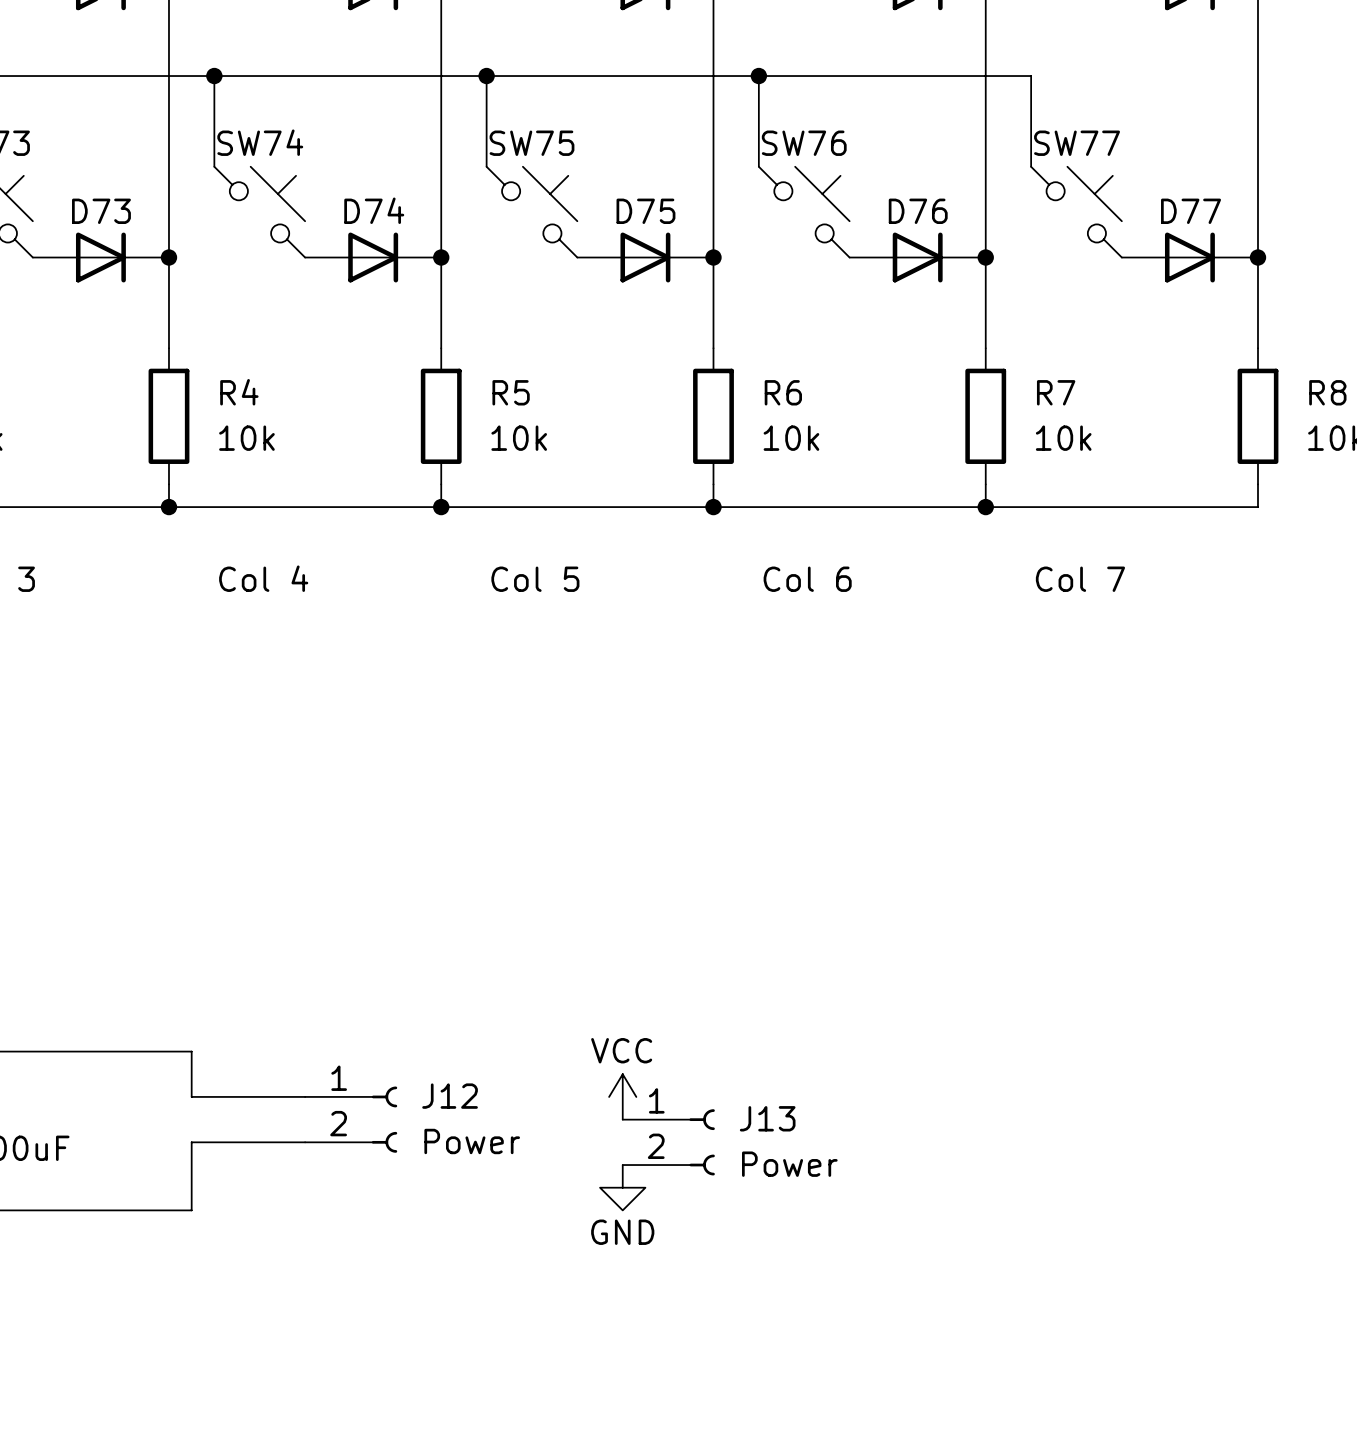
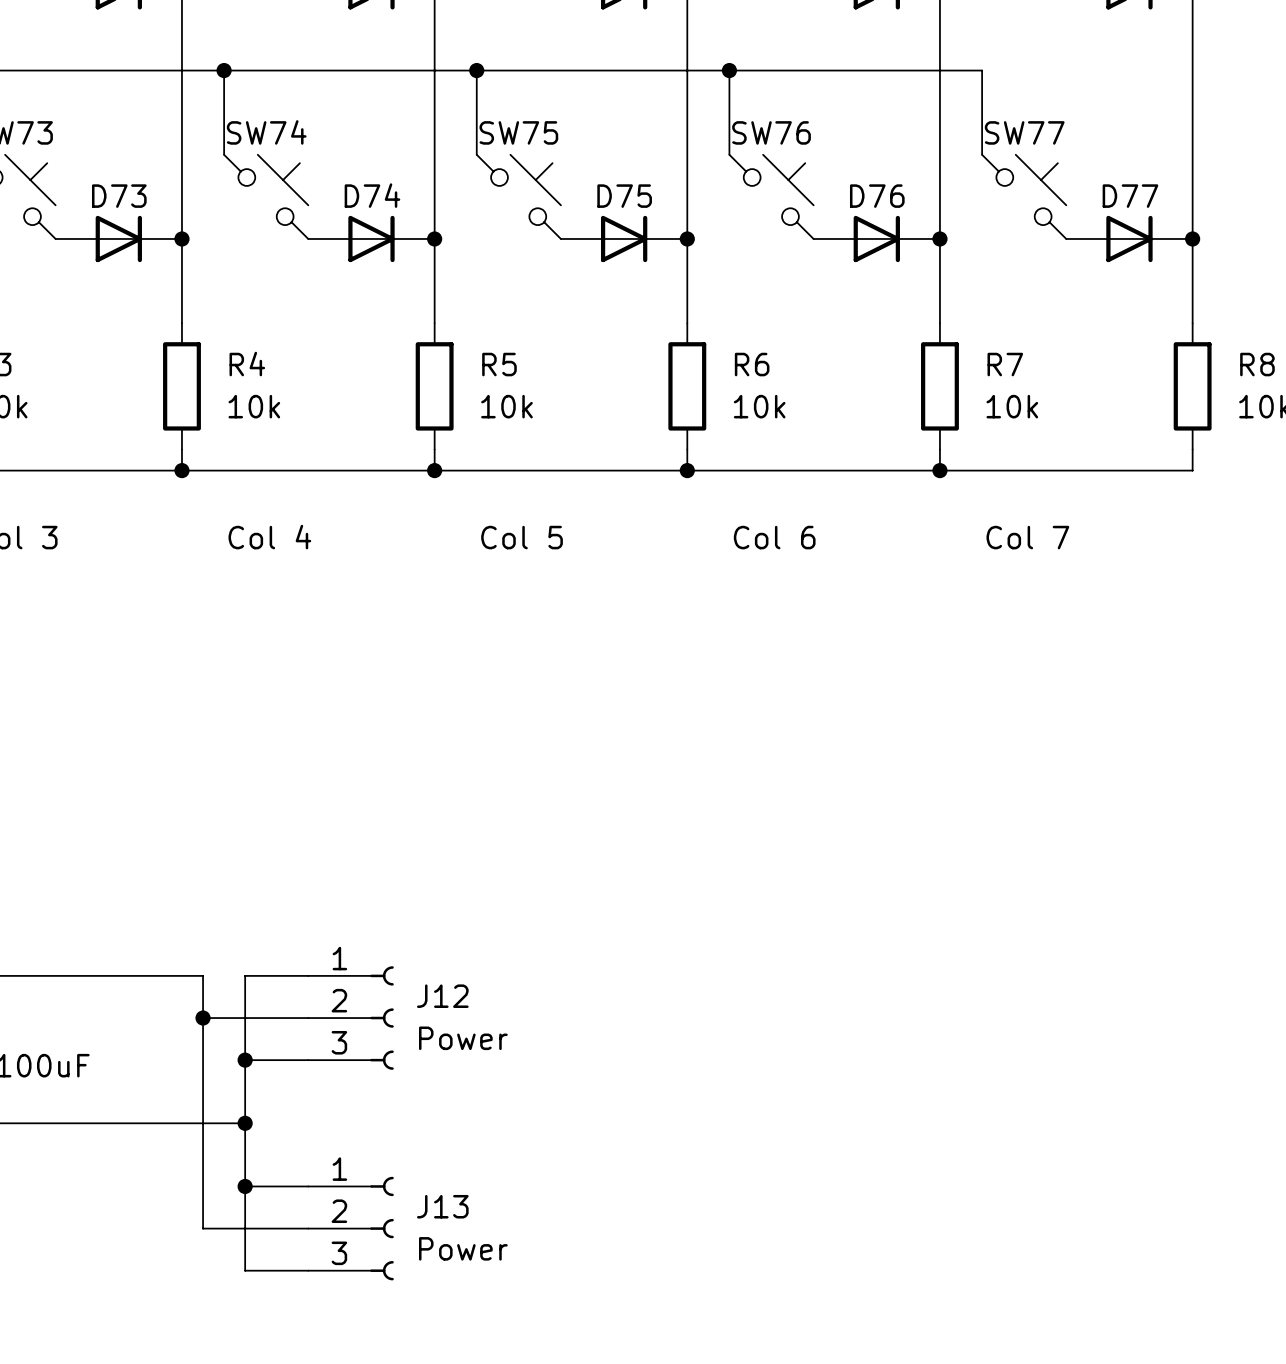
wire: none -> (308, 975) (245, 975) (245, 1270) (308, 1270)
J12 symbol: [305, 1086, 398, 1153] -> [308, 966, 394, 1070]
junction: none -> (203, 1018)
power symbol: VCC (622, 1096) -> none
J13 symbol: [622, 1109, 715, 1176] -> [308, 1176, 394, 1281]
wire: (191, 1142) (237, 1142) -> (203, 1060) (203, 1018)
junction: none -> (245, 1060)
power symbol: GND (622, 1187) -> none
wire: none -> (245, 1123) (203, 1123) (203, 1228) (308, 1228)
junction: none -> (245, 1123)
wire: none -> (245, 1186) (308, 1186)
junction: none -> (245, 1186)

